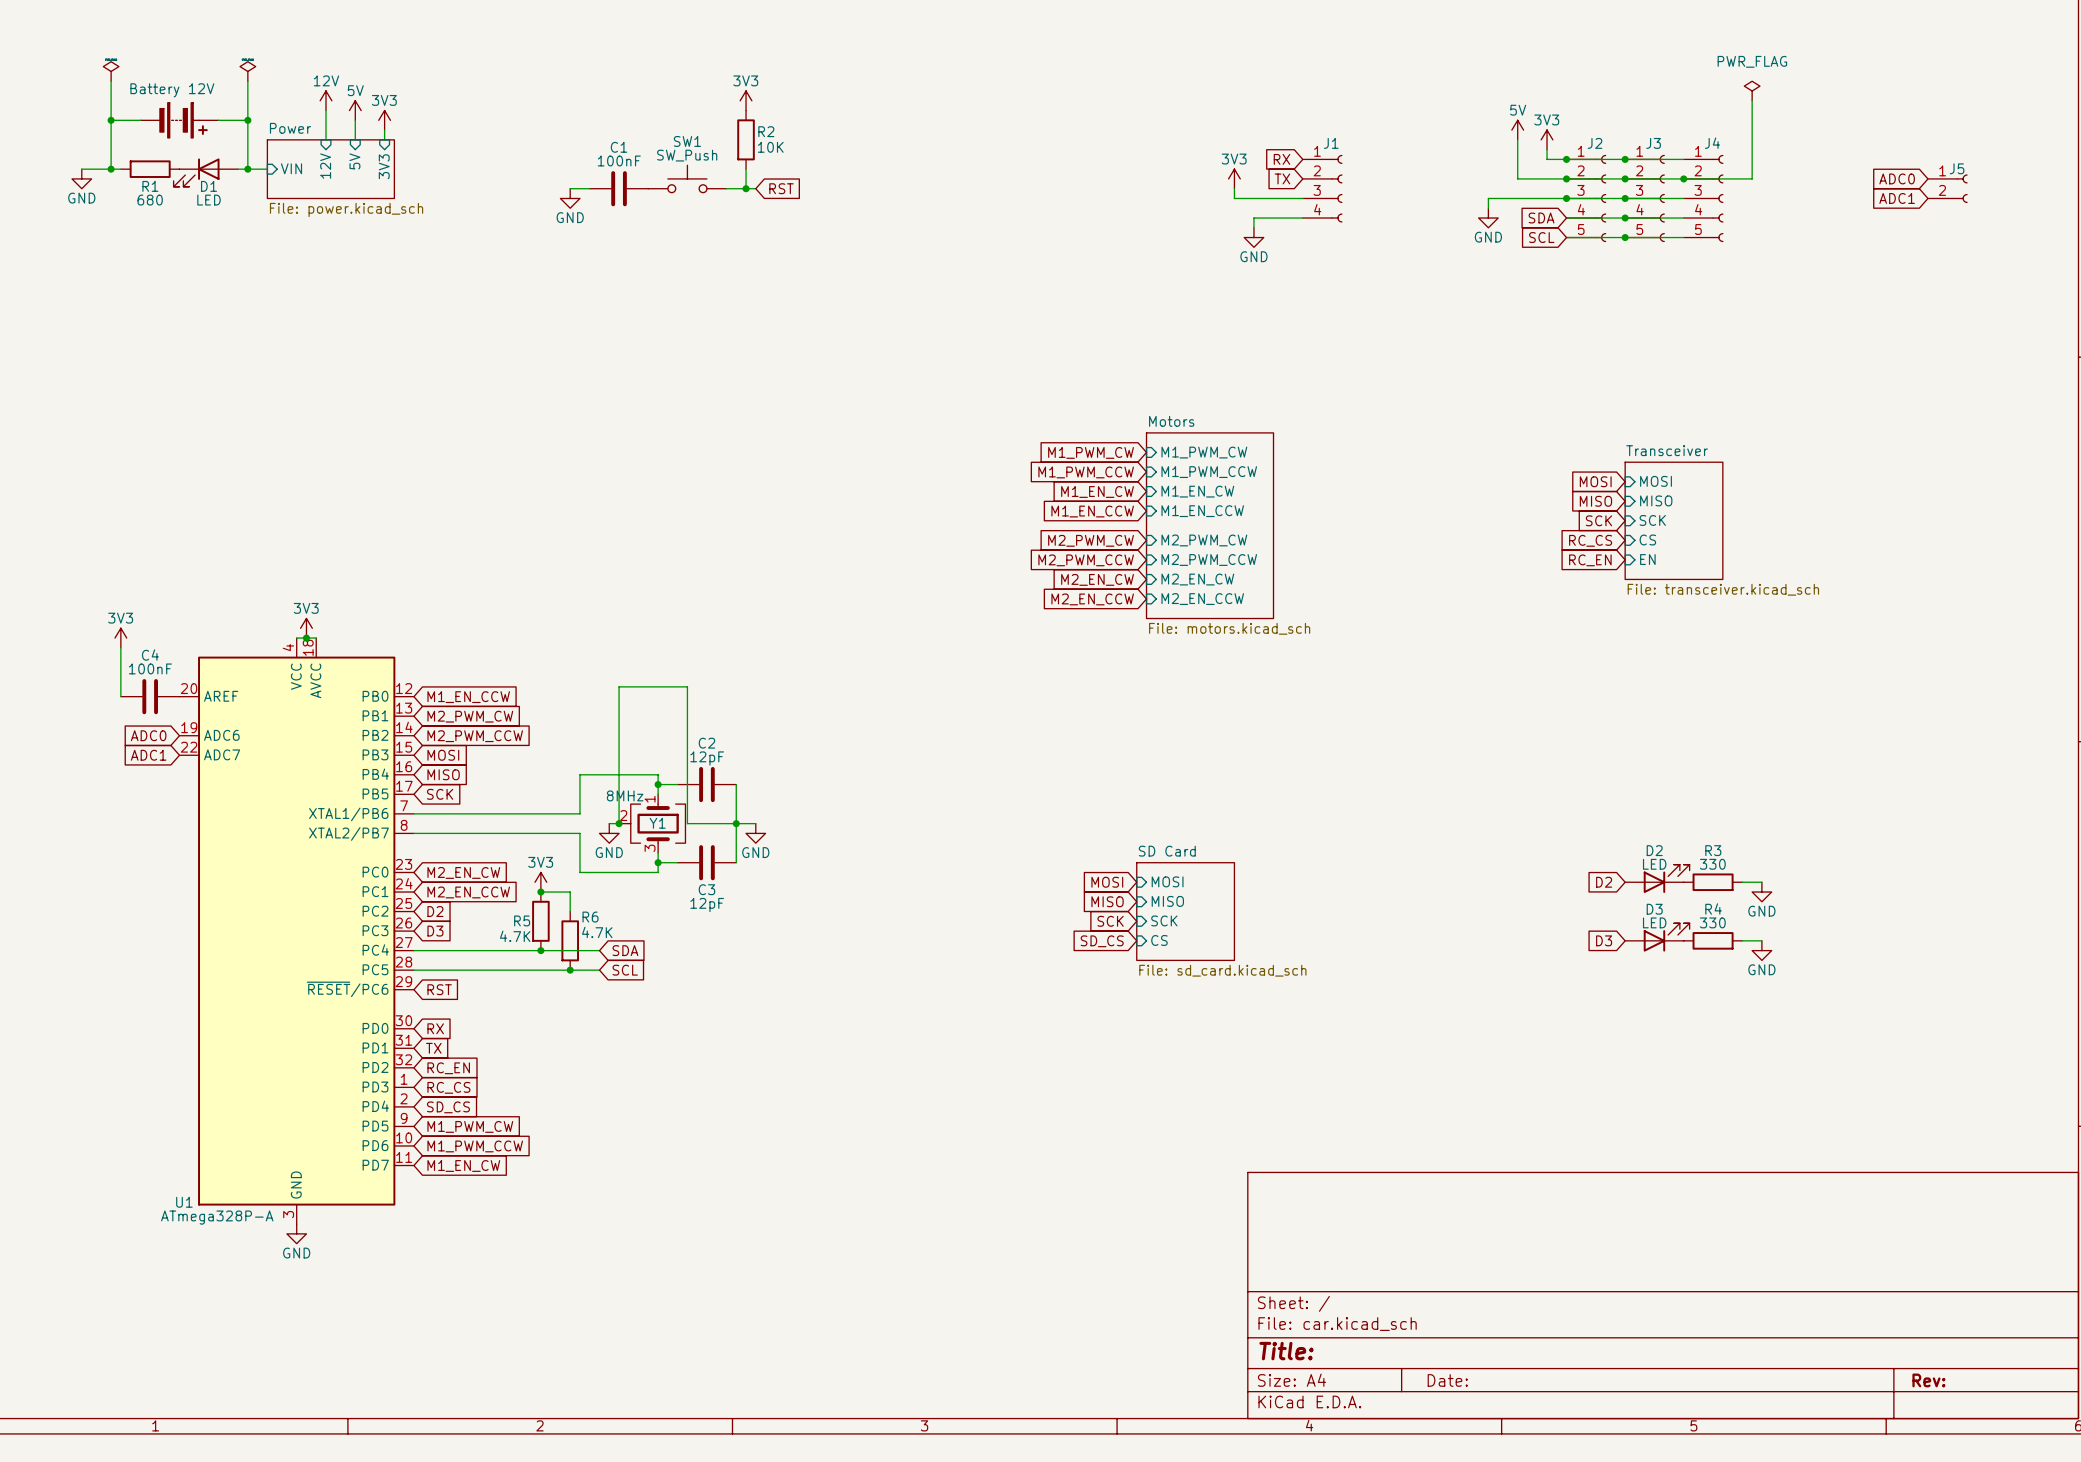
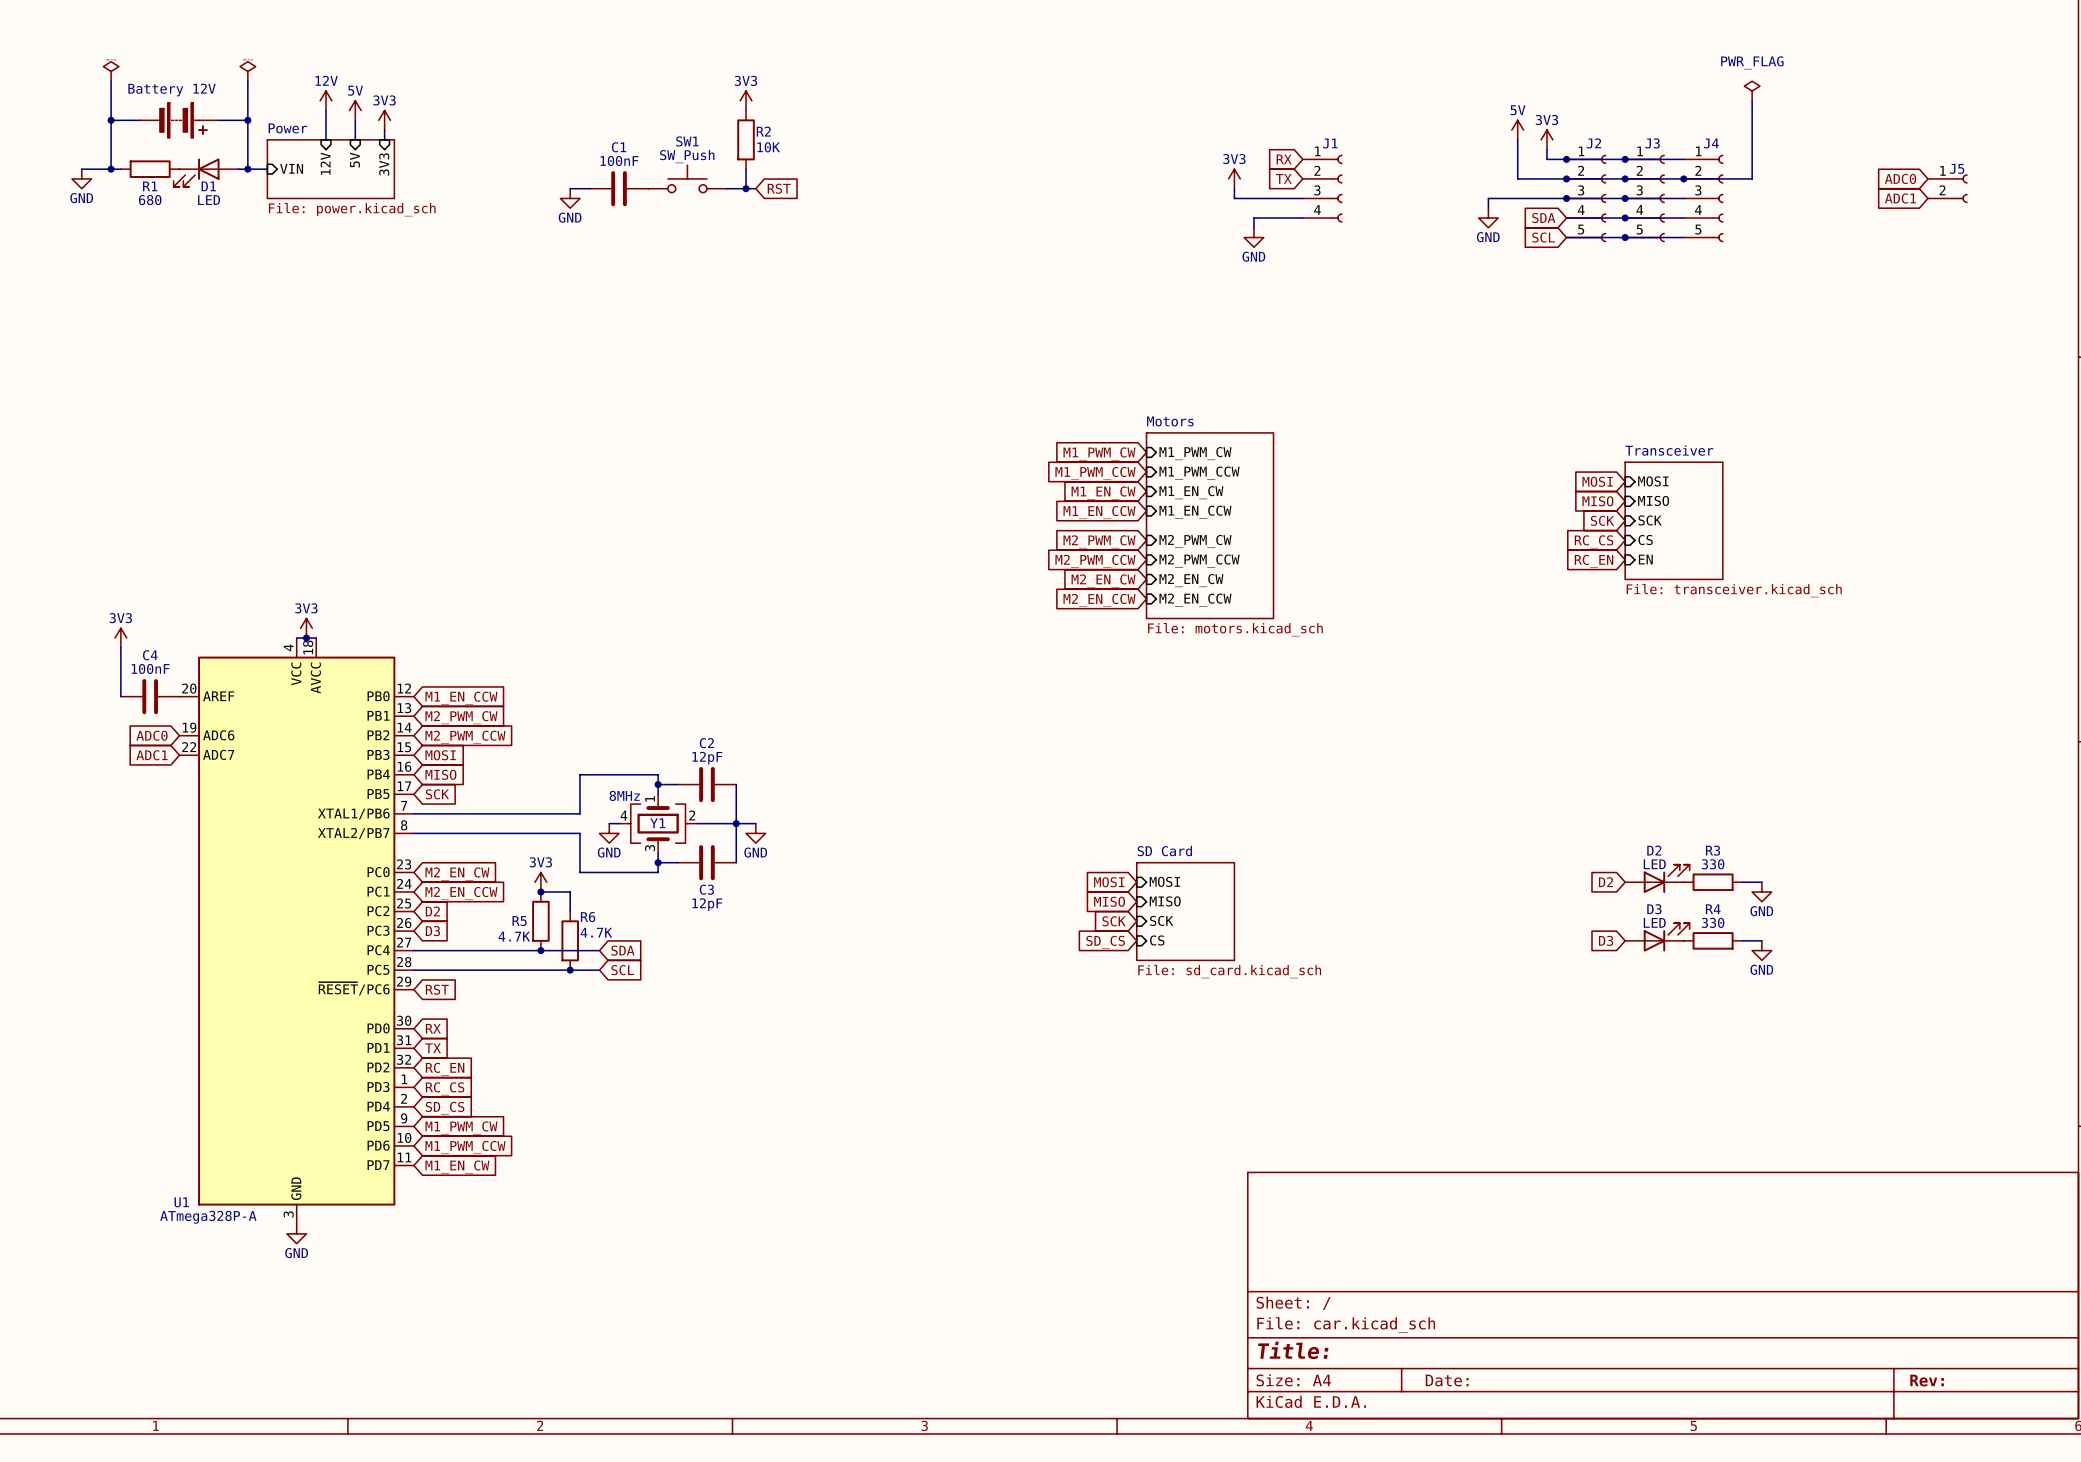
Y1 symbol: [619, 794, 686, 853] -> [619, 794, 698, 853]
wire: (619, 823) (619, 686) (687, 686) (687, 823) (697, 823) -> none
junction: (619, 823) -> none

